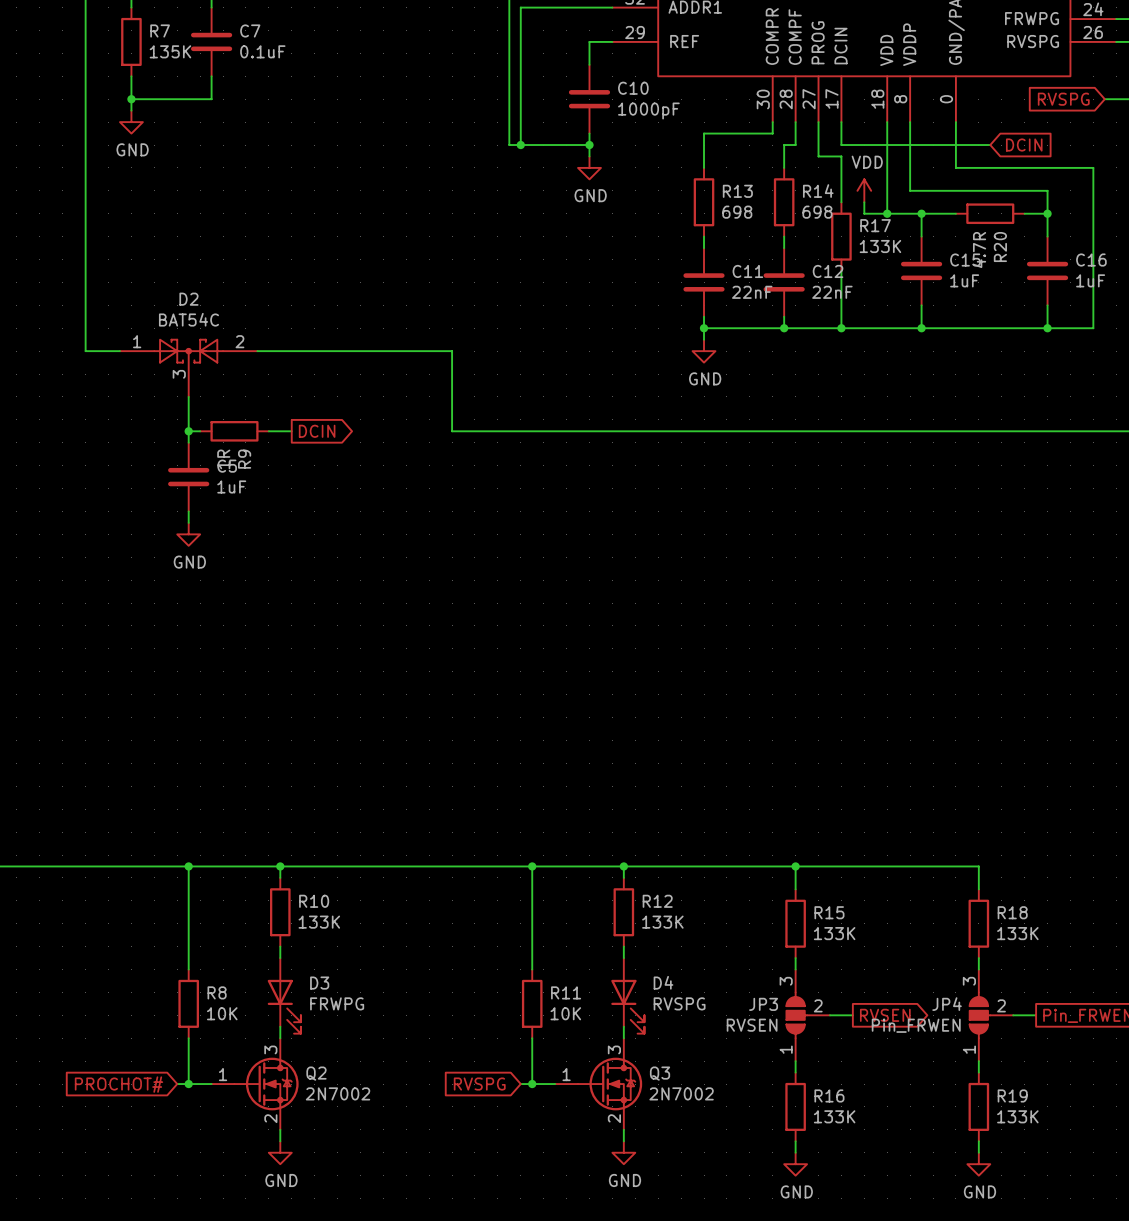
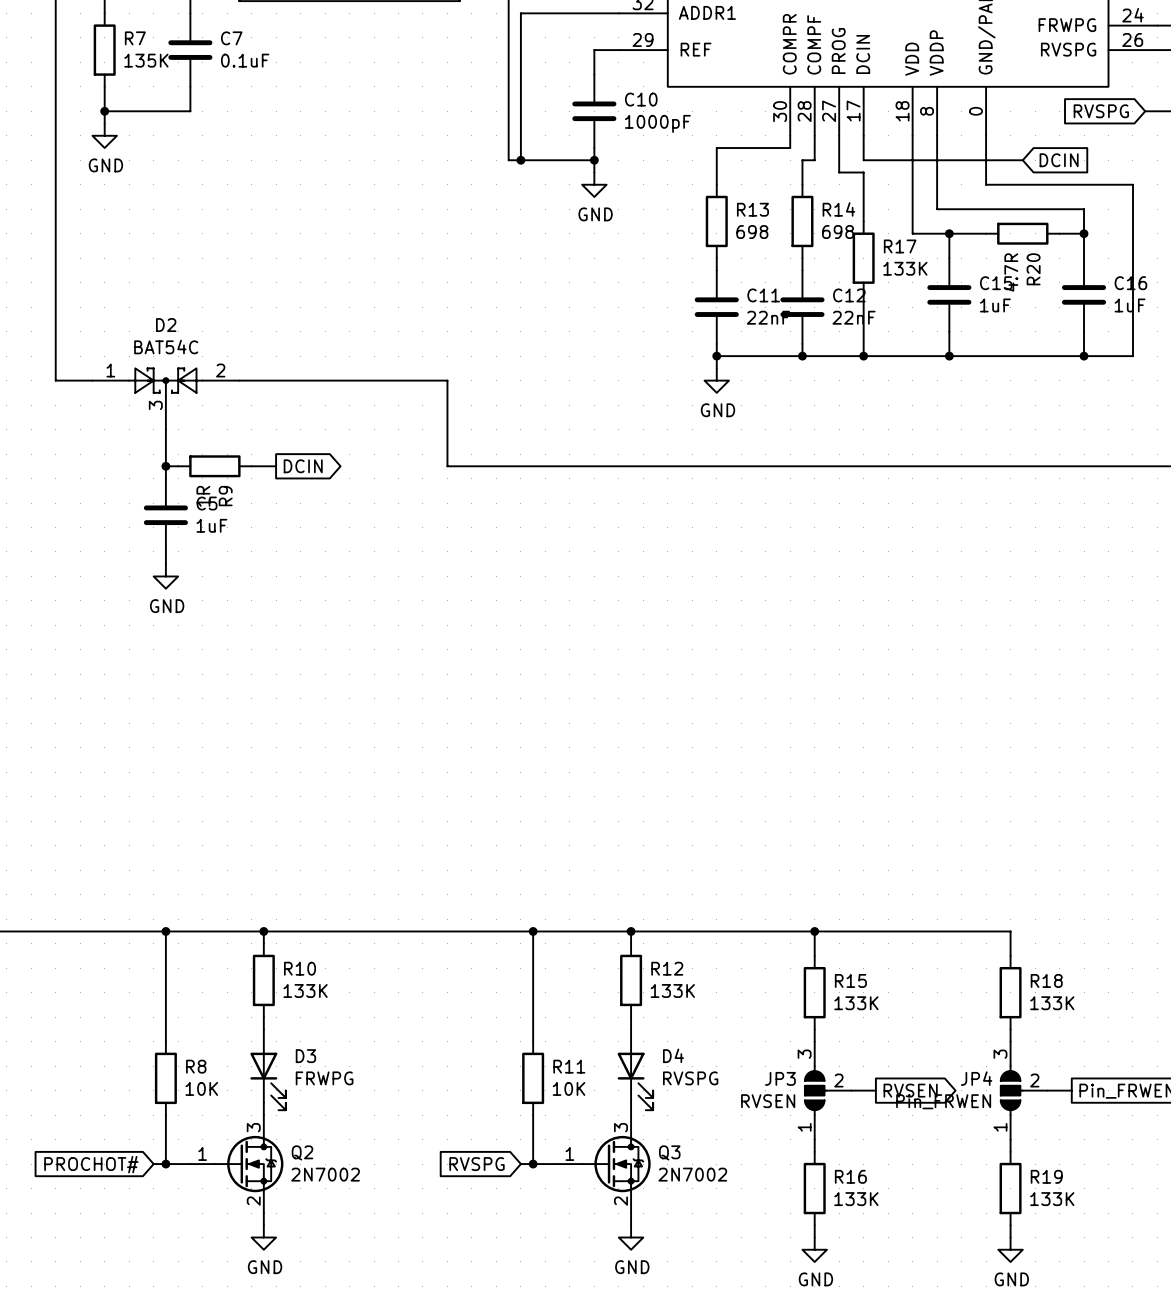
power symbol: VDD (864, 190) -> none
wire: (864, 202) (864, 213) (887, 213) -> none
junction: (887, 213) -> none

